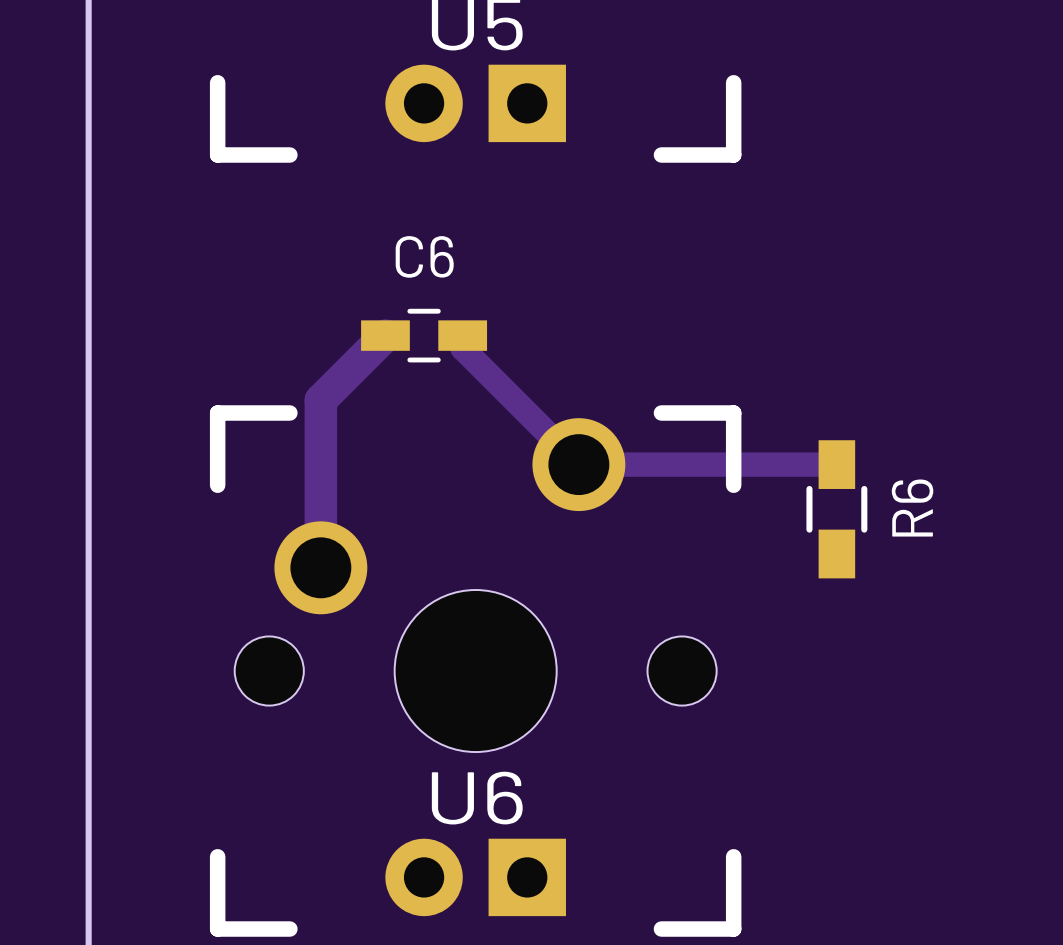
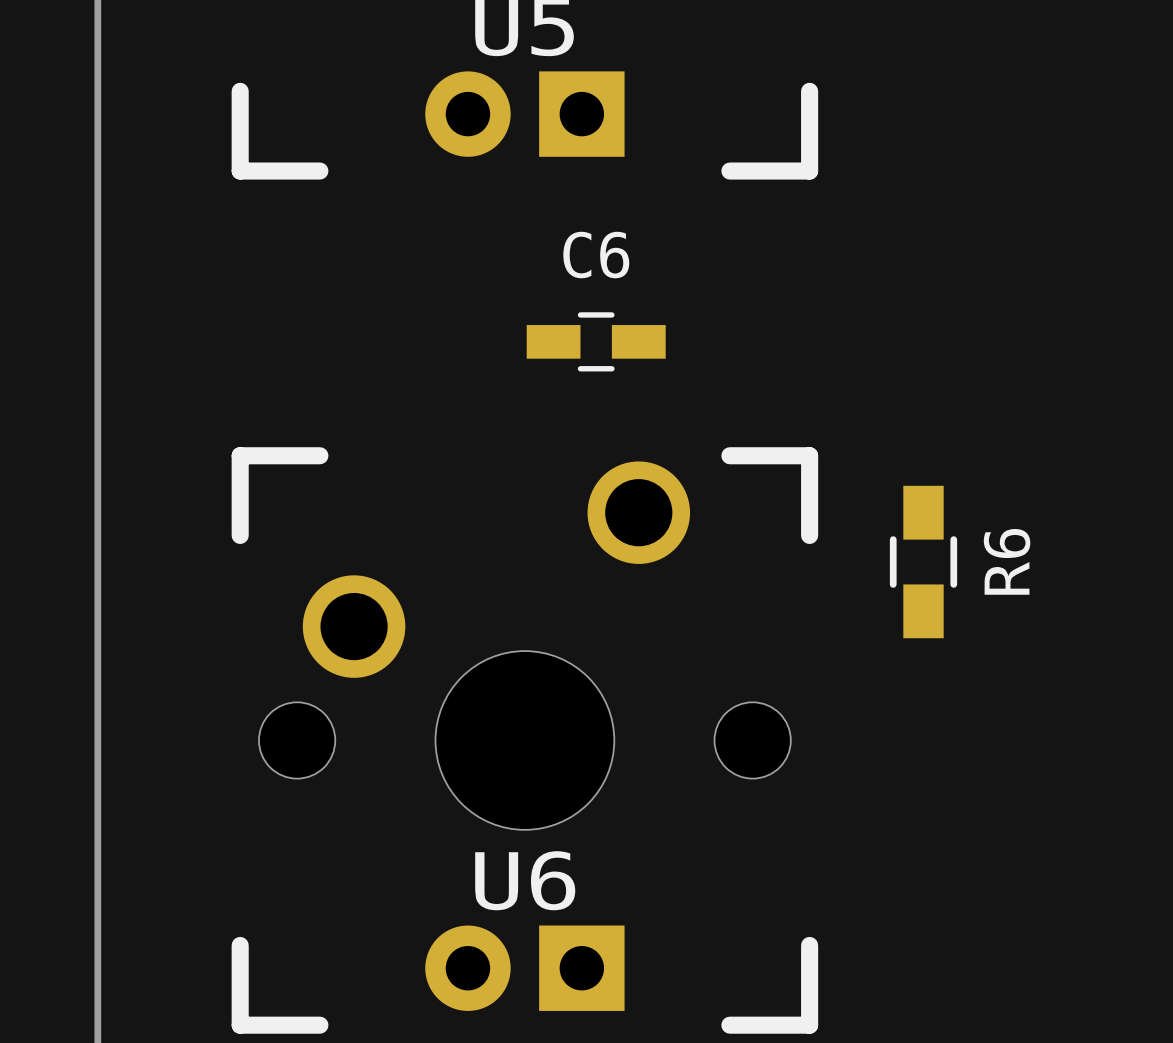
track: (385, 335) (320, 400) (320, 567) -> none
C6 position: (424, 335) -> (596, 341)
track: (462, 335) (462, 348) (578, 464) (836, 464) -> none

